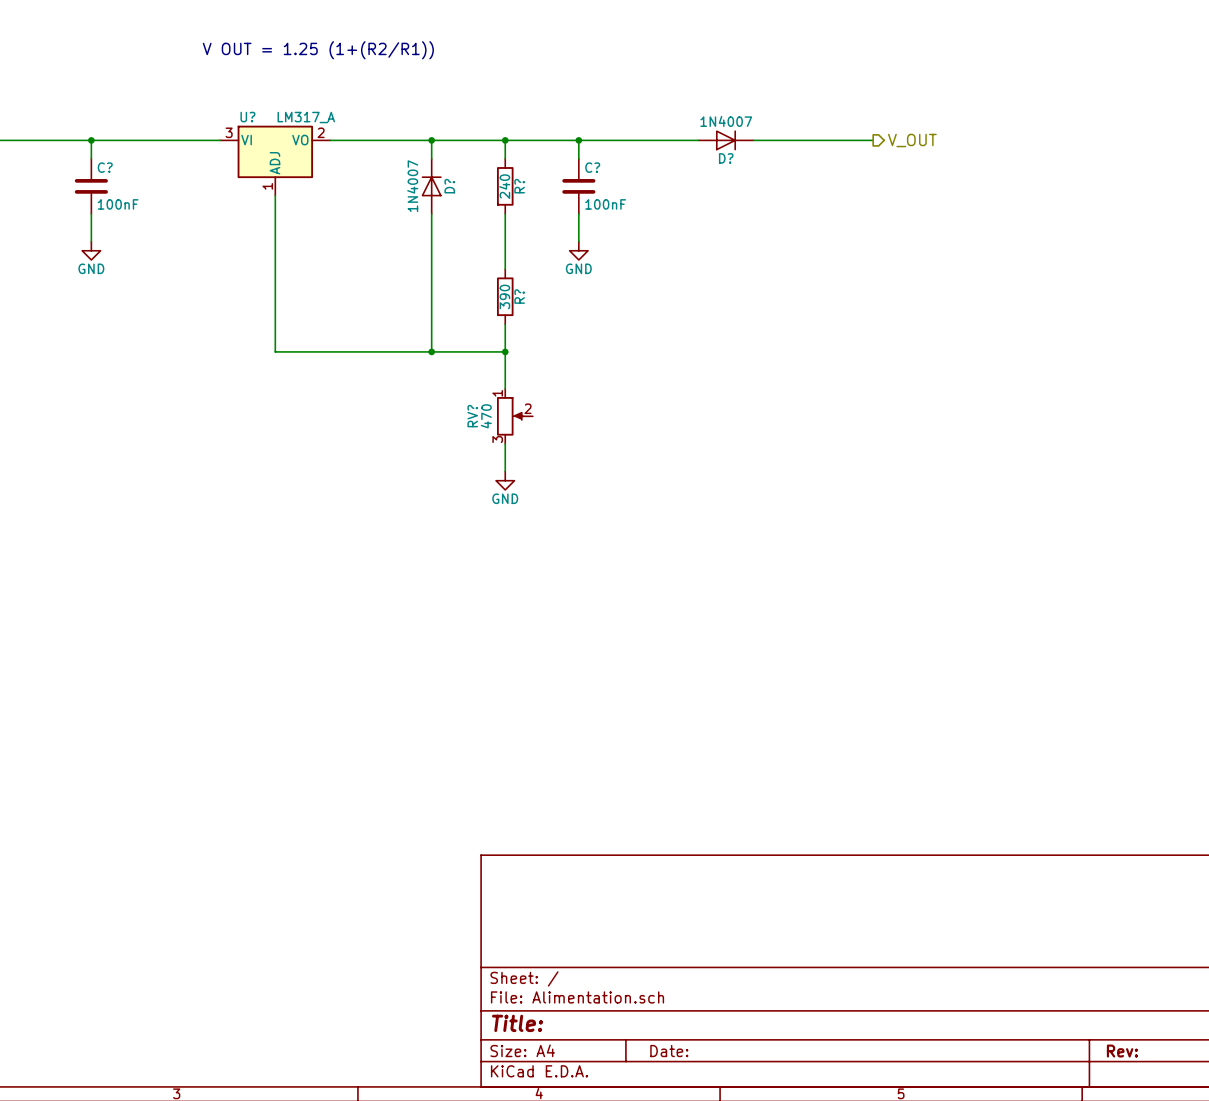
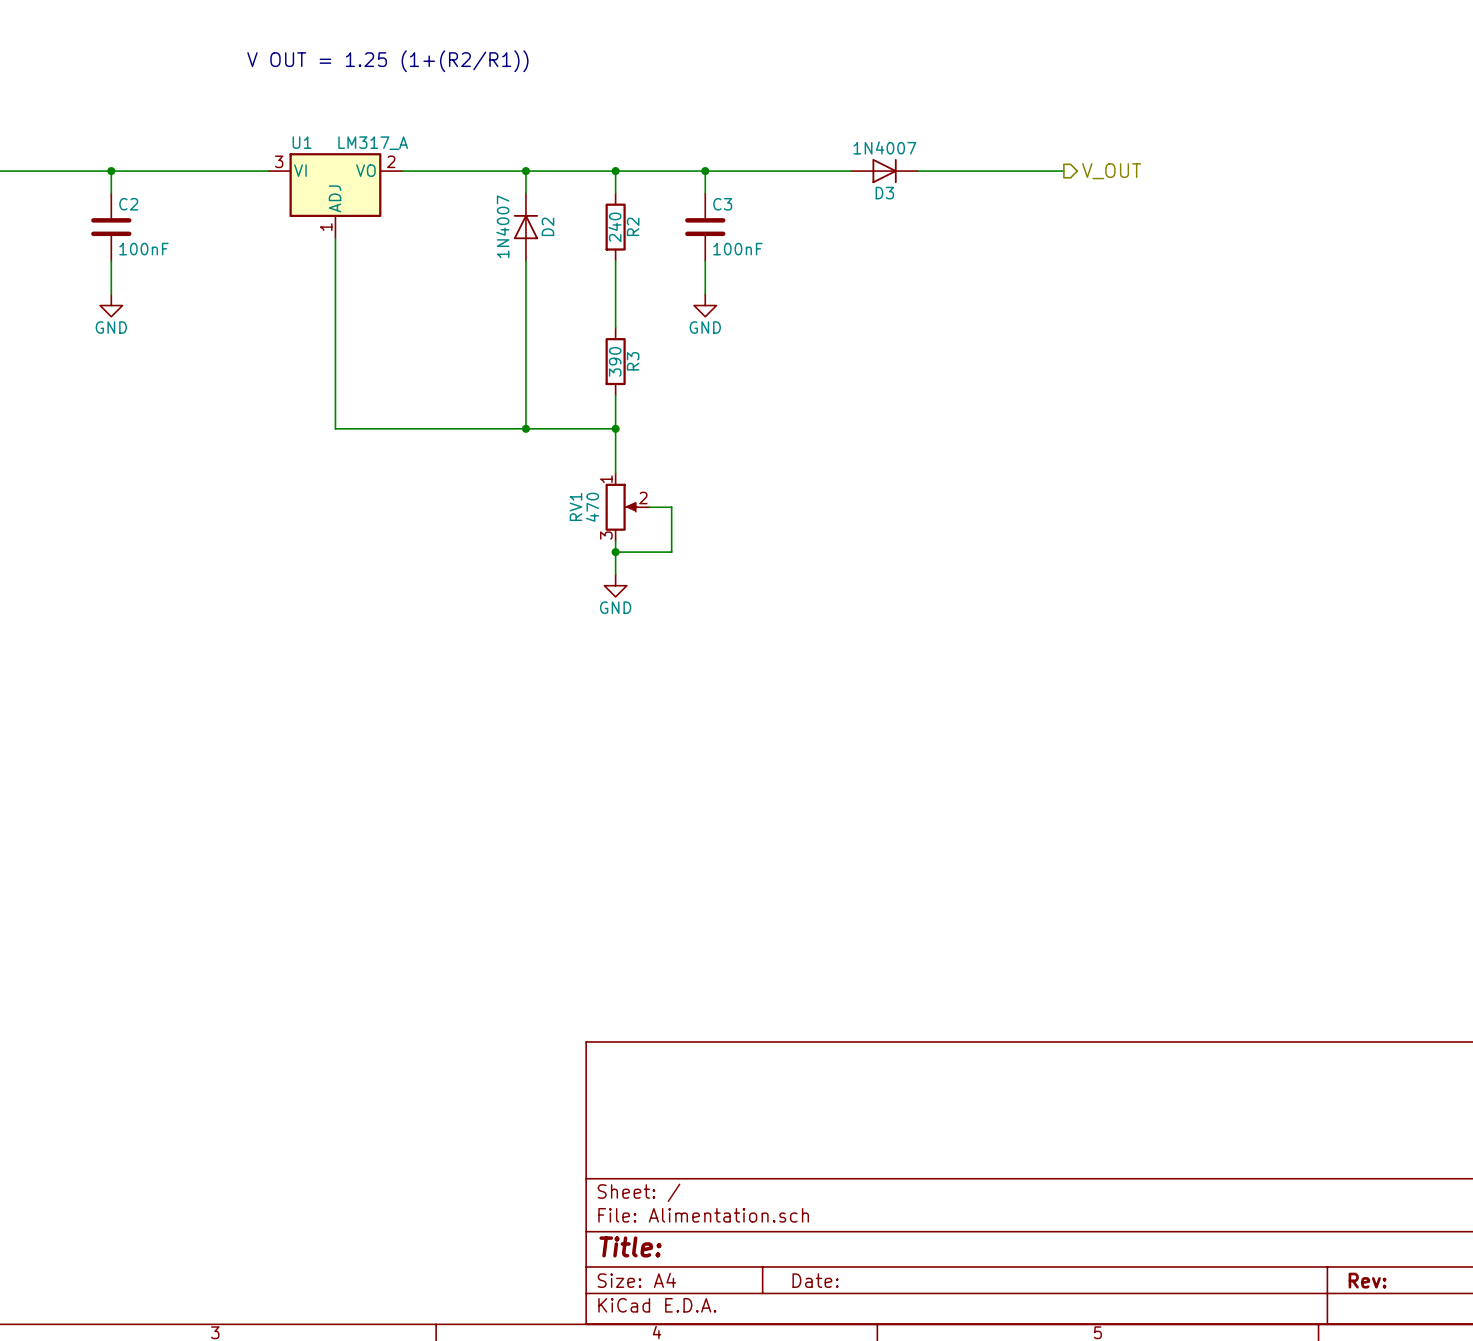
U? name: U? (247, 117) -> U1 (302, 142)
D? name: D? (726, 158) -> D3 (884, 193)
C? name: C? (105, 167) -> C2 (128, 204)
C? name: C? (592, 167) -> C3 (722, 204)
D? name: D? (449, 186) -> D2 (547, 226)
R? name: R? (519, 186) -> R2 (633, 226)
R? name: R? (519, 296) -> R3 (633, 361)
RV? name: RV? (472, 416) -> RV1 (575, 506)
wire: none -> (649, 507) (671, 507) (671, 552) (615, 552)
junction: none -> (615, 552)

